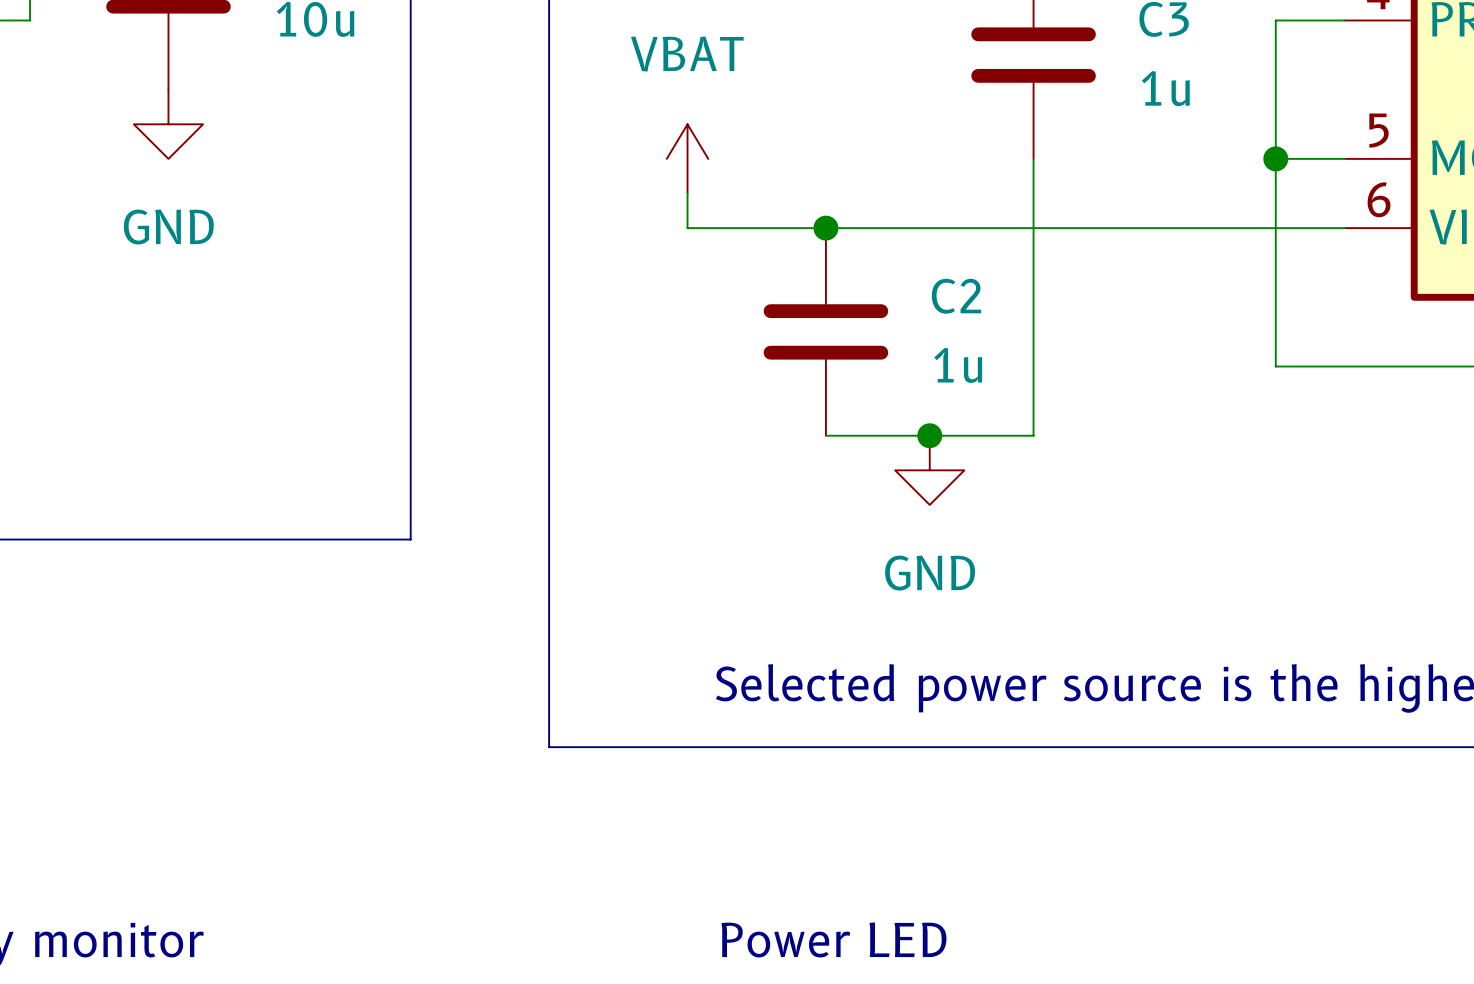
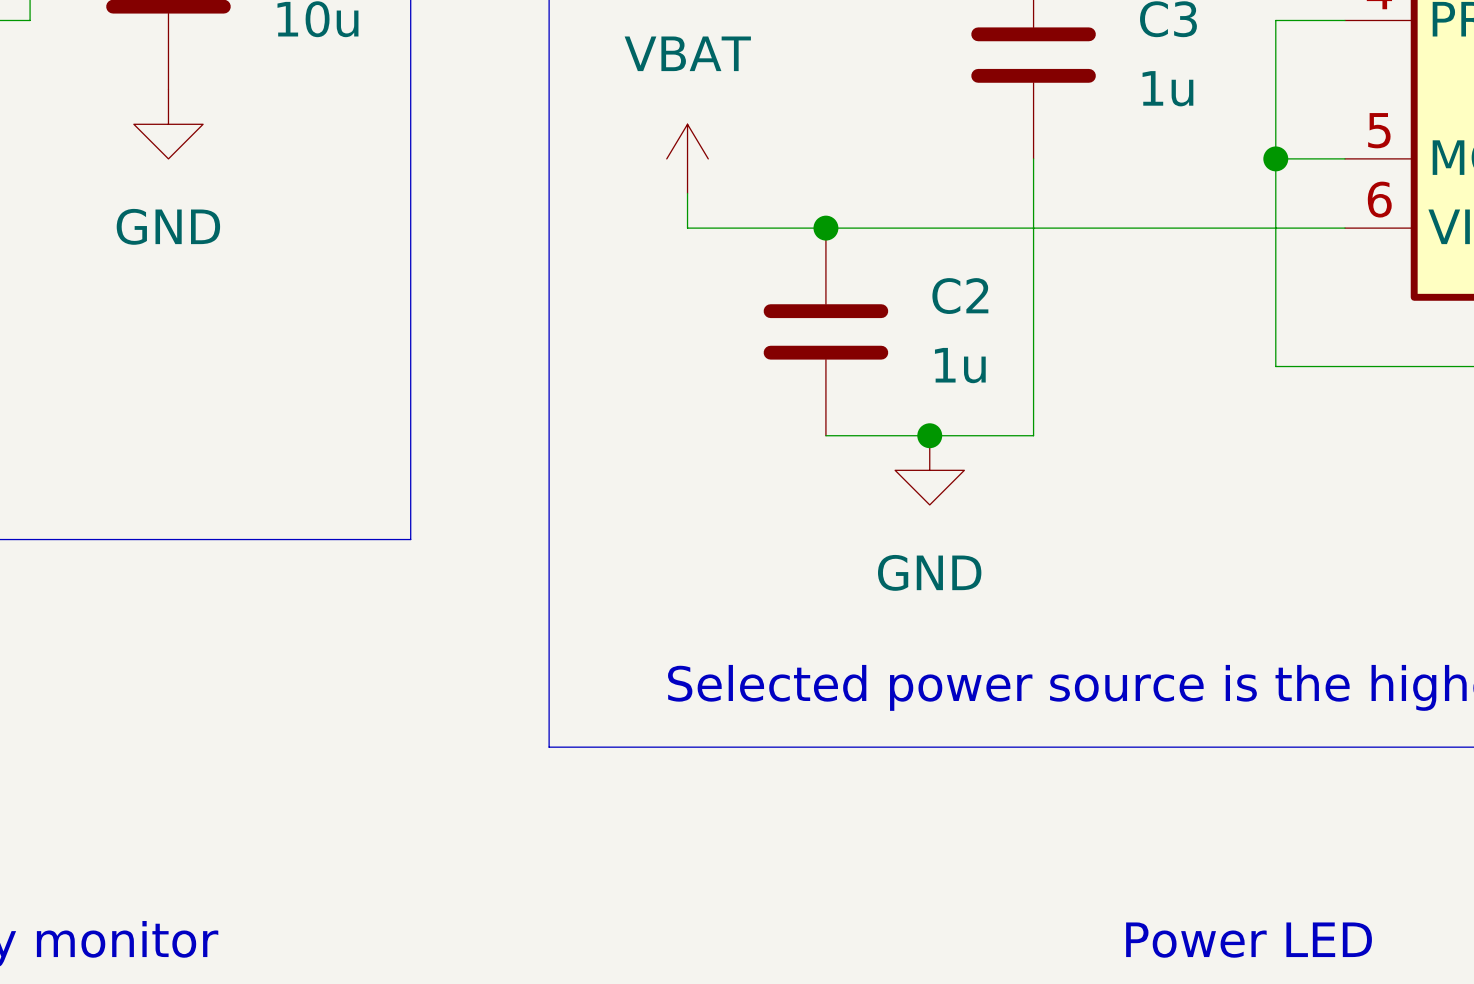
text position: Power LED (833, 939) -> Power LED (1249, 940)

